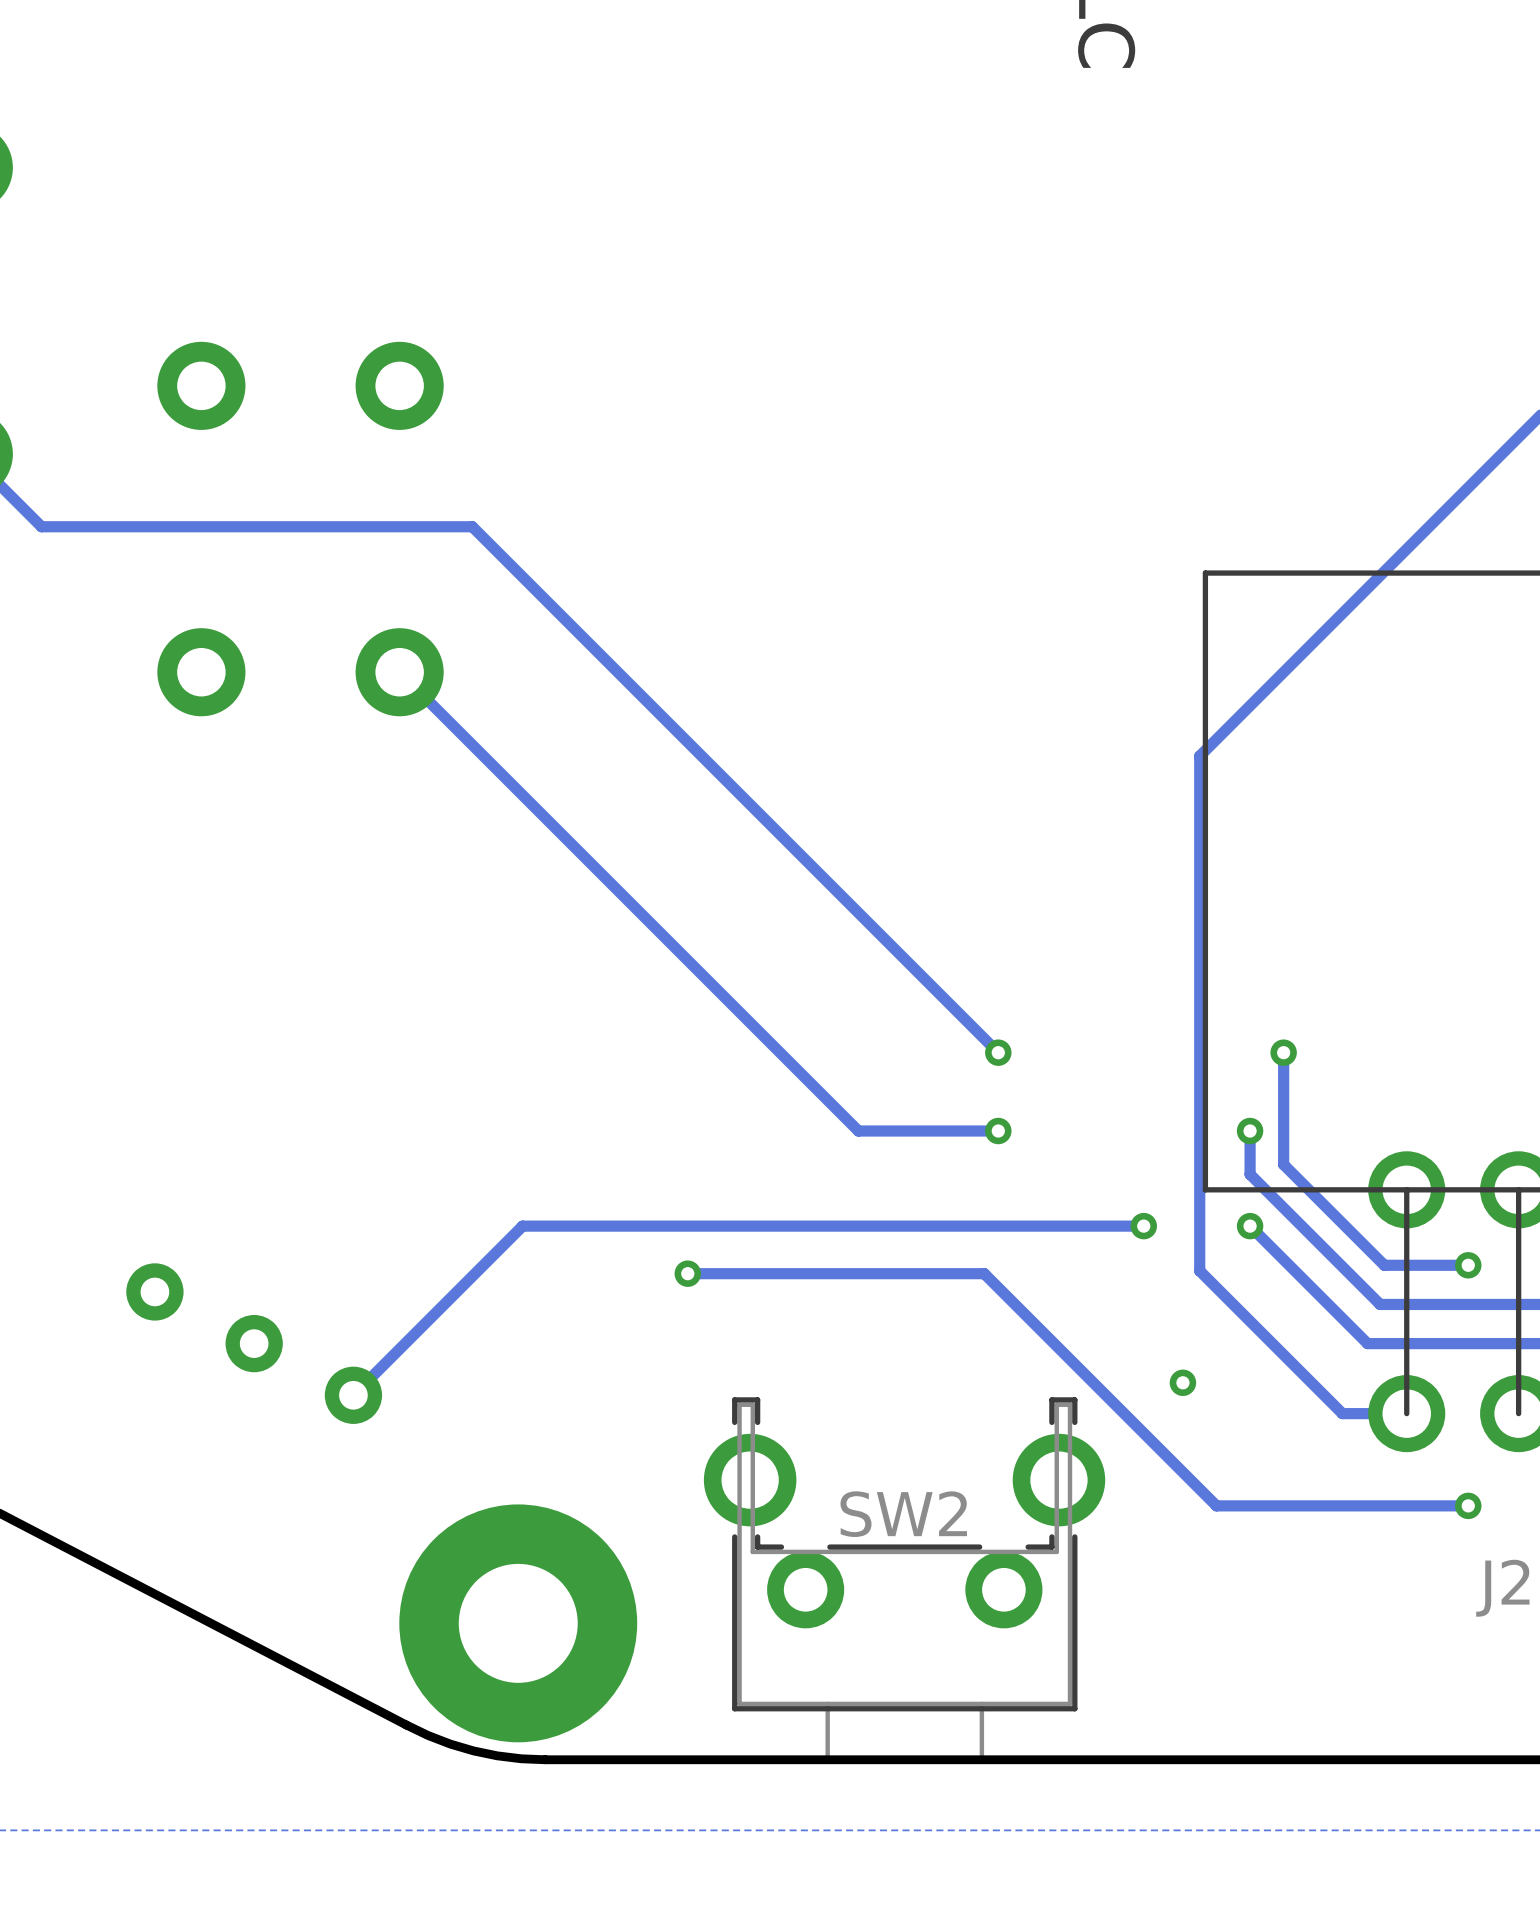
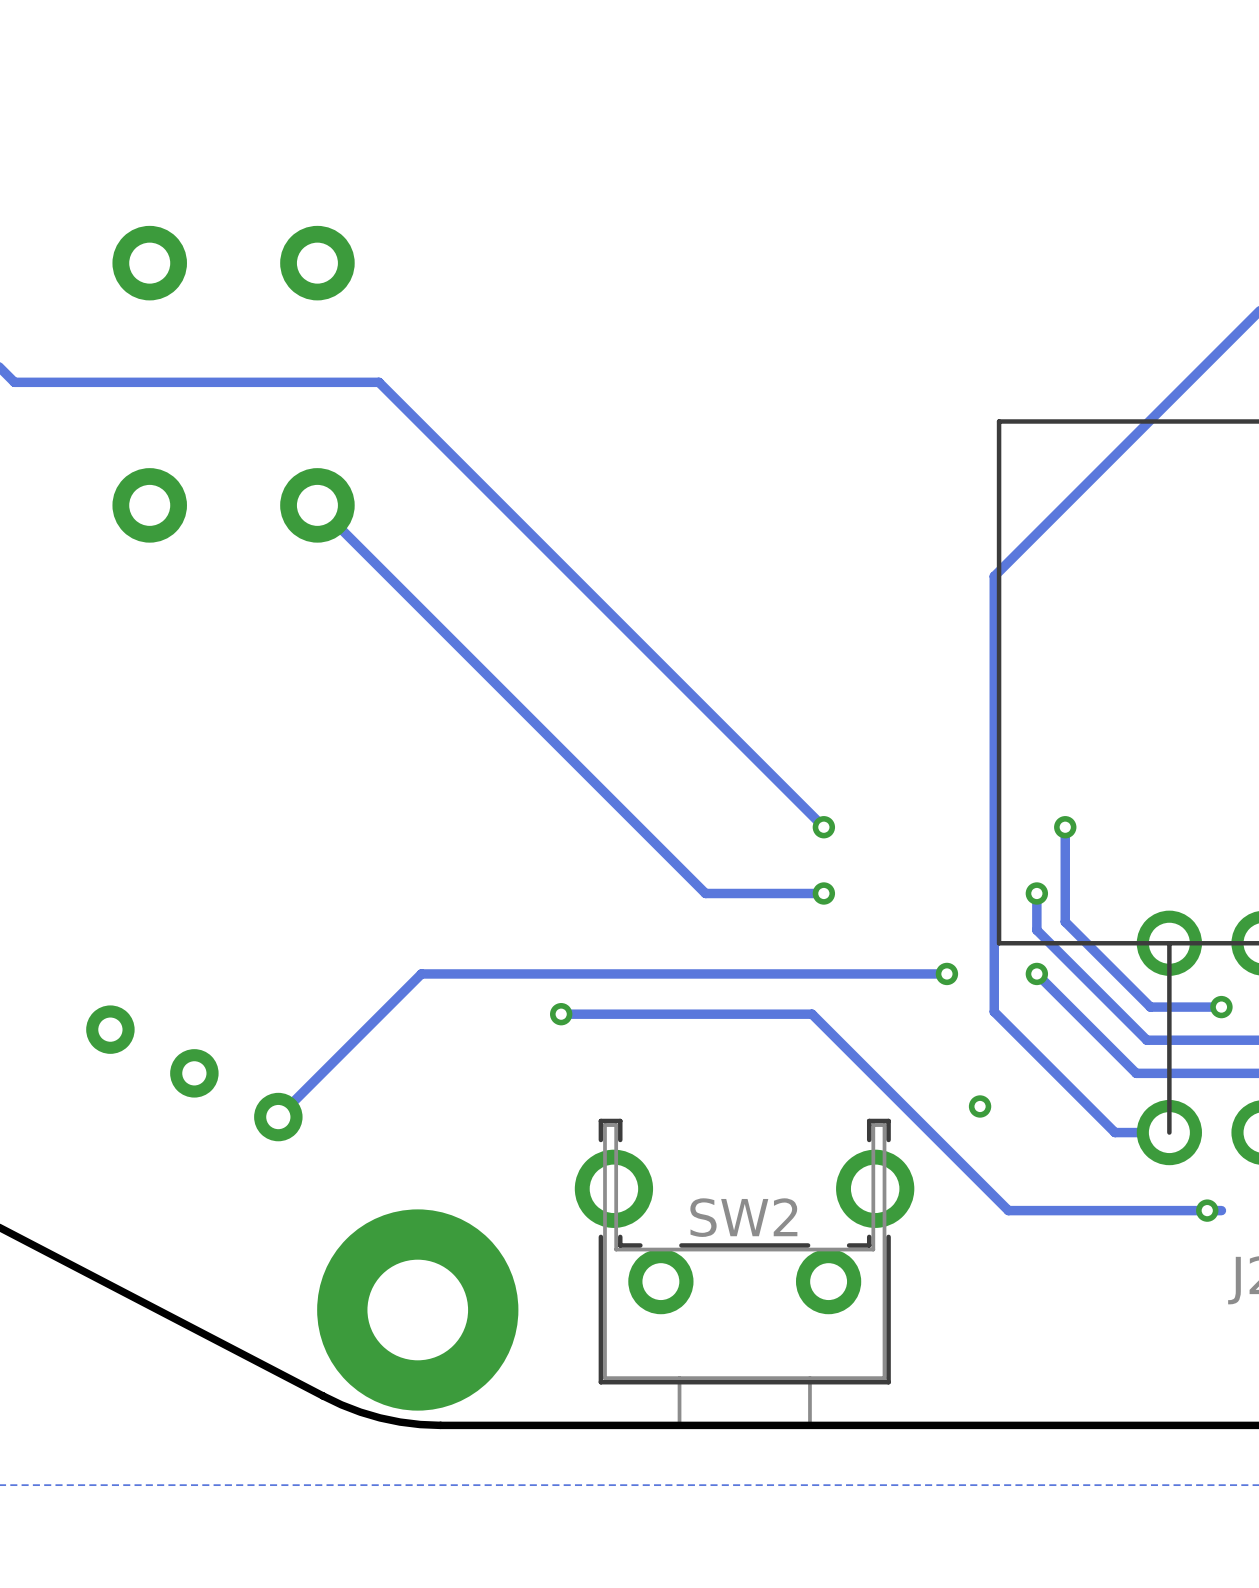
via position: (1468, 1505) -> (1207, 1210)

